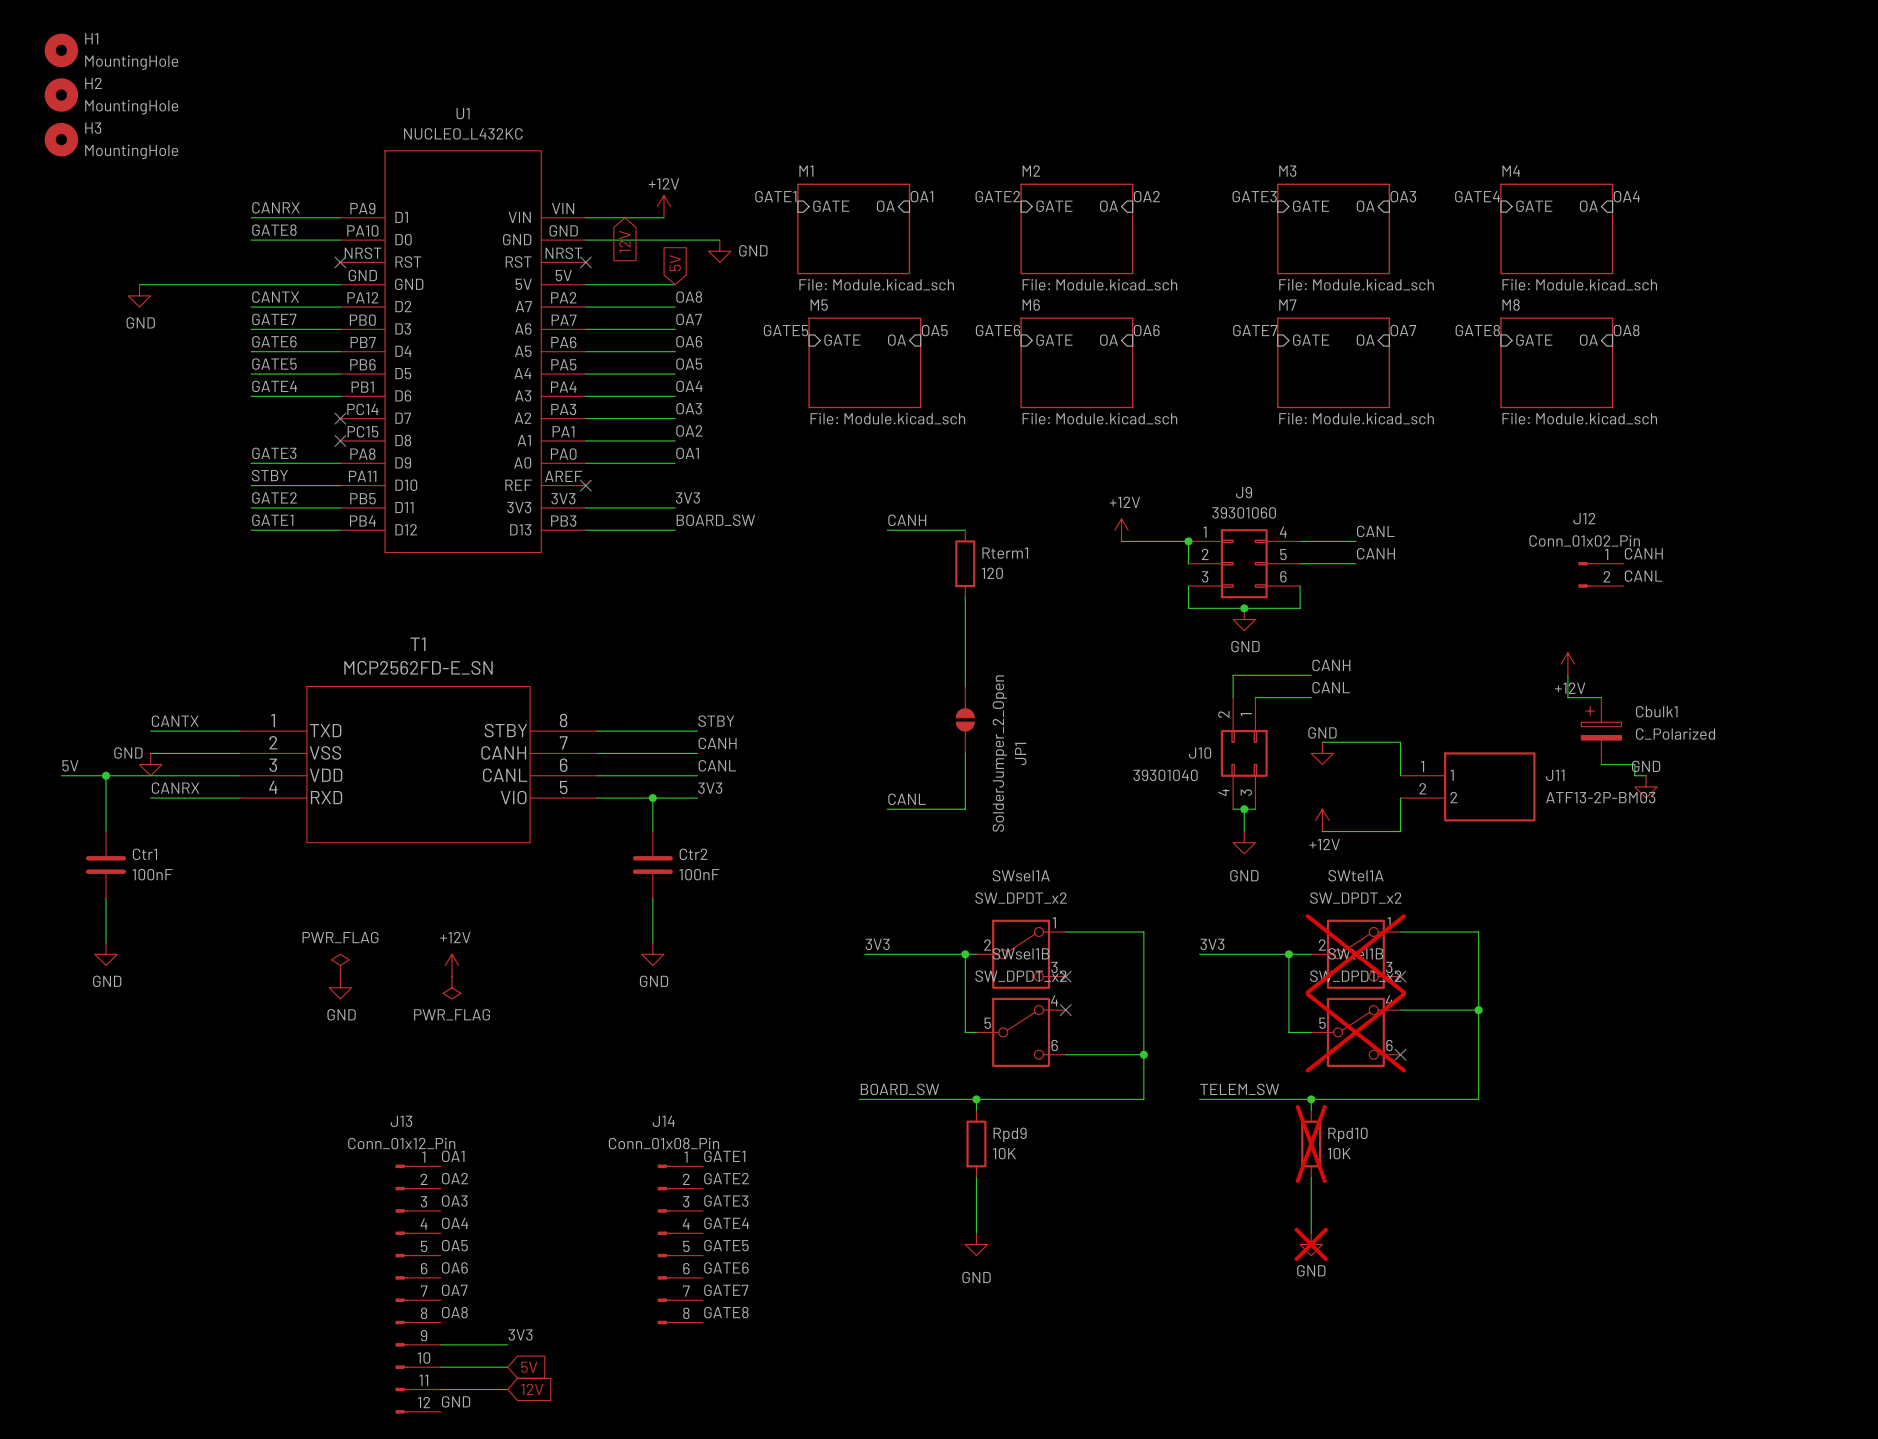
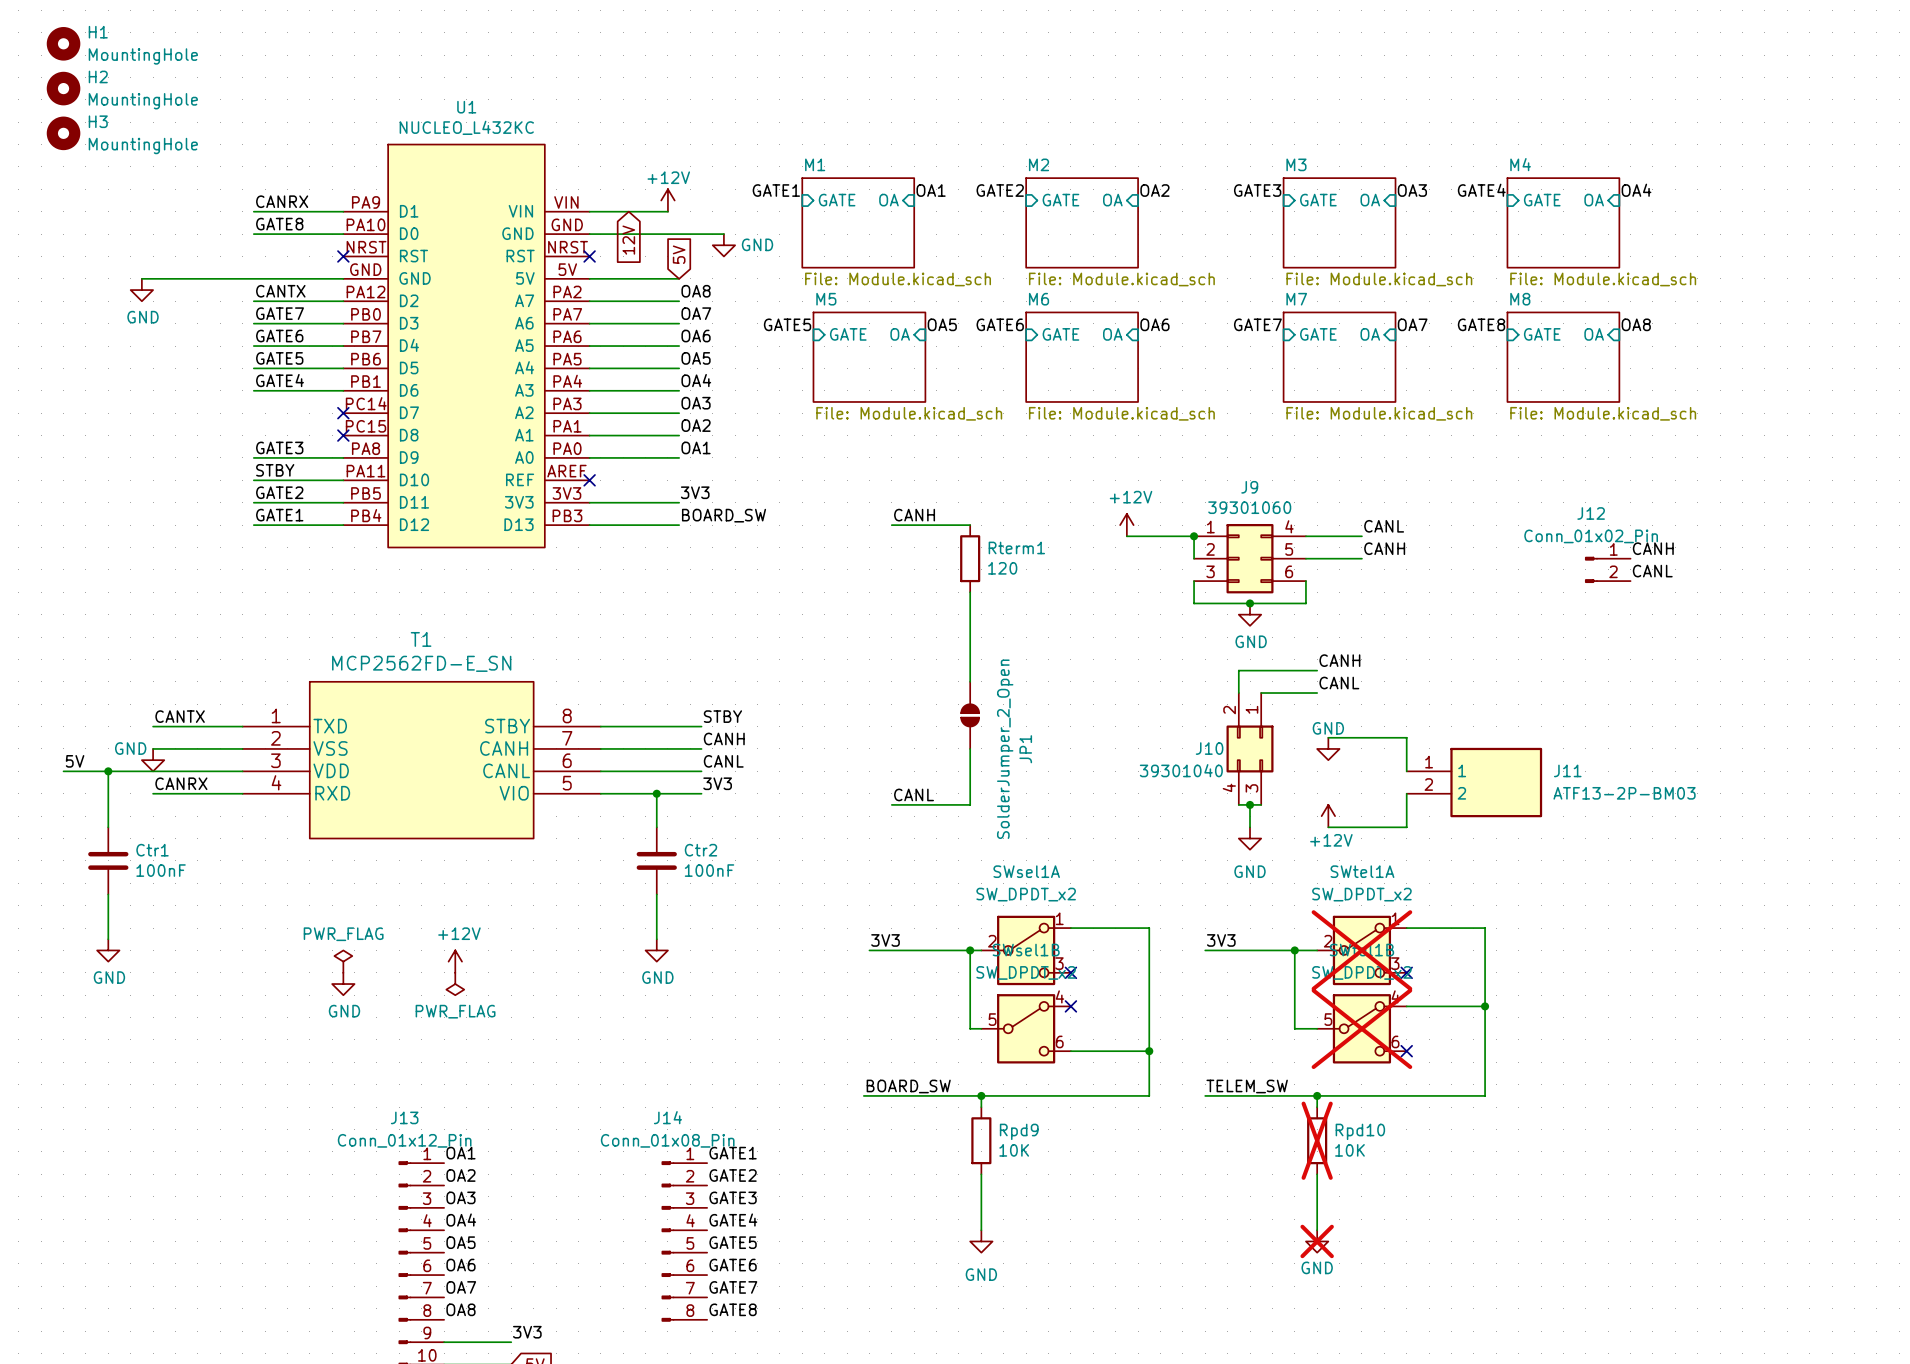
power symbol: +12V (1567, 664) -> none
wire: (1567, 675) (1567, 697) (1601, 697) -> none
Cbulk1: C_Polarized (1601, 731) -> none
wire: (1601, 764) (1634, 764) (1634, 775) (1646, 775) -> none
power symbol: GND (1646, 786) -> none

